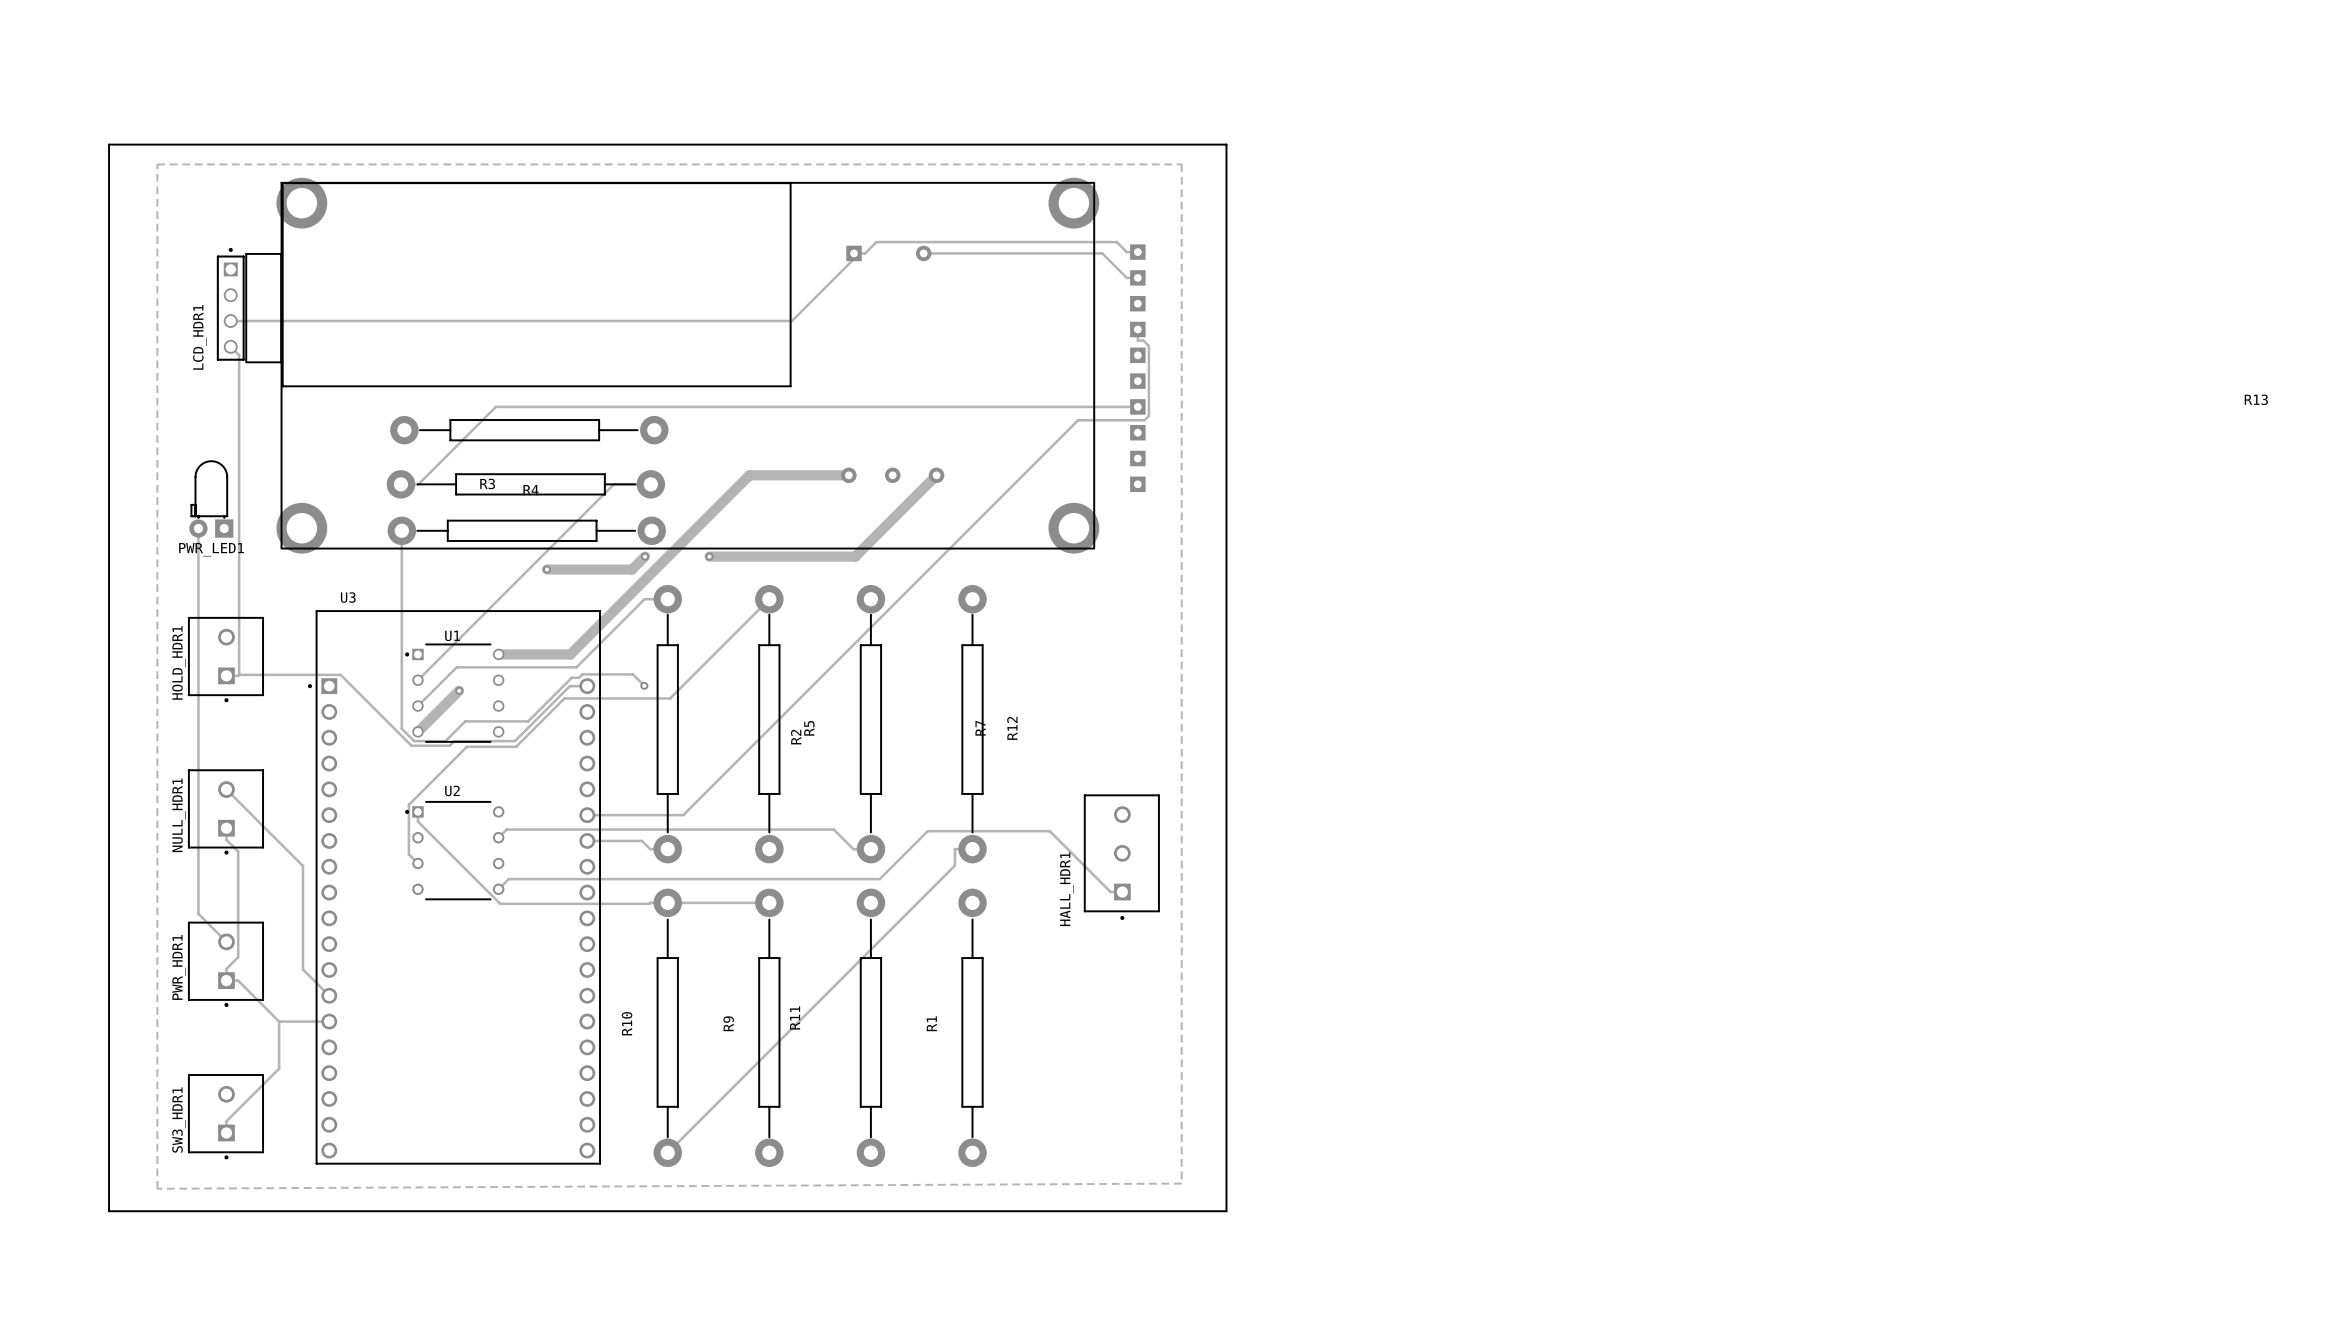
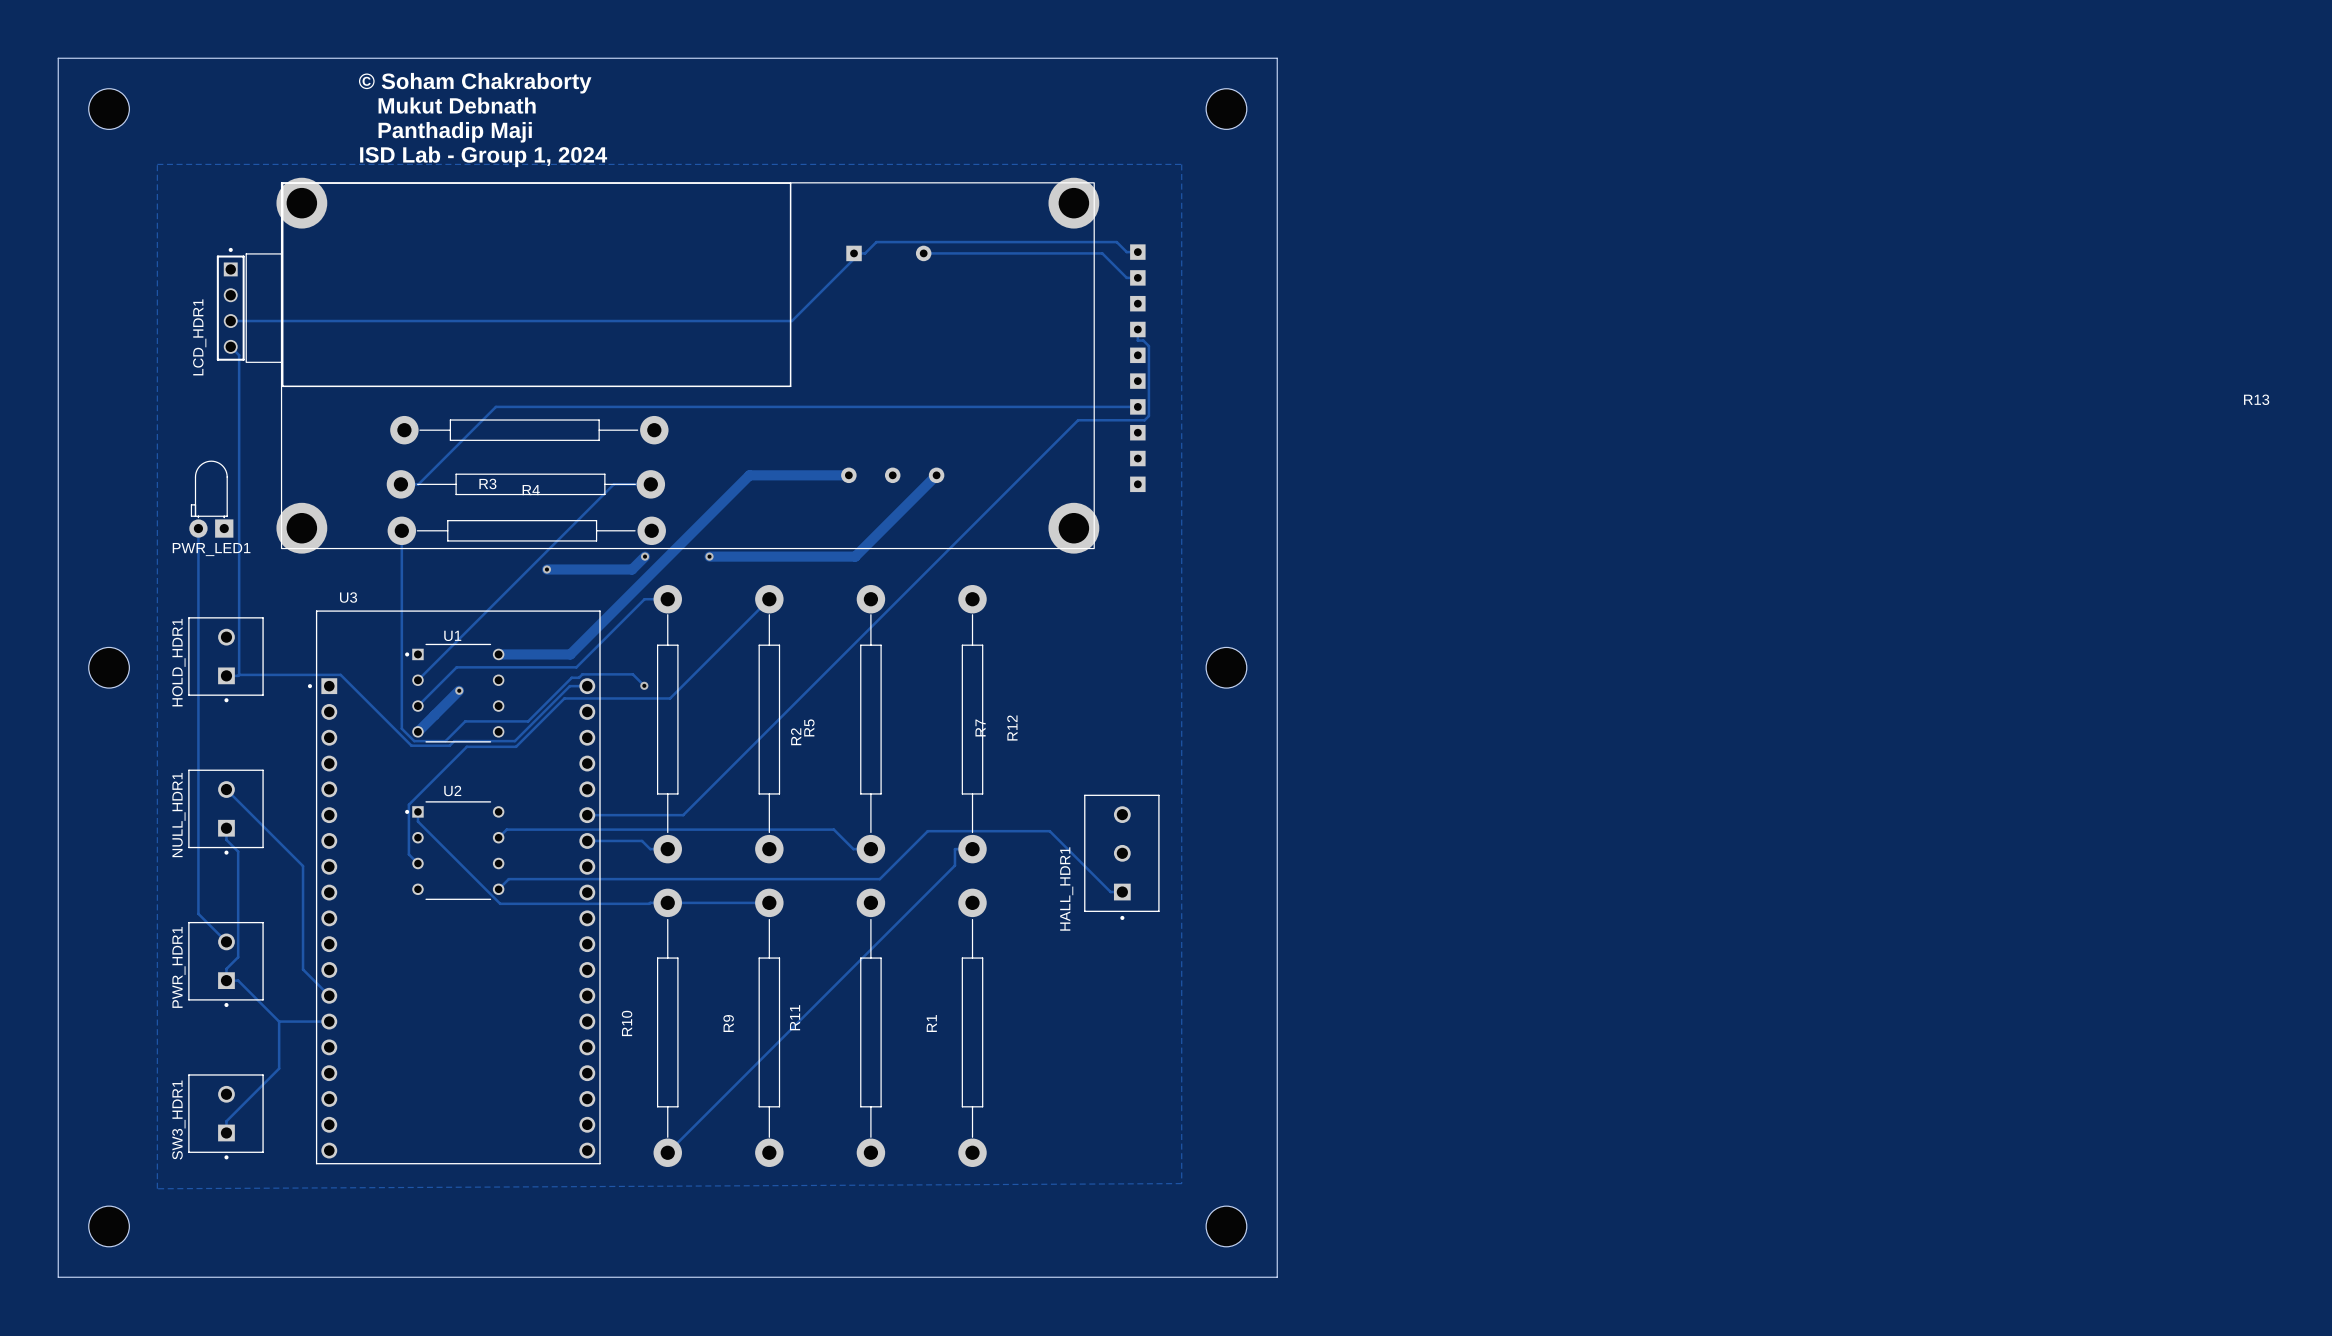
text: none -> © Soham Chakraborty (475, 83)
text: none -> Mukut Debnath (457, 105)
part: none -> (109, 109)
part: none -> (1226, 109)
text: none -> Panthadip Maji (455, 132)
board edge: (109, 144) (1226, 144) (1226, 1211) (109, 1211) (109, 144) -> (58, 58) (58, 1277) (1277, 1277) (1277, 58) (58, 58)
text: none -> ISD Lab - Group 1, 2024 (483, 156)
part: none -> (109, 667)
part: none -> (1226, 667)
part: none -> (109, 1226)
part: none -> (1226, 1226)

